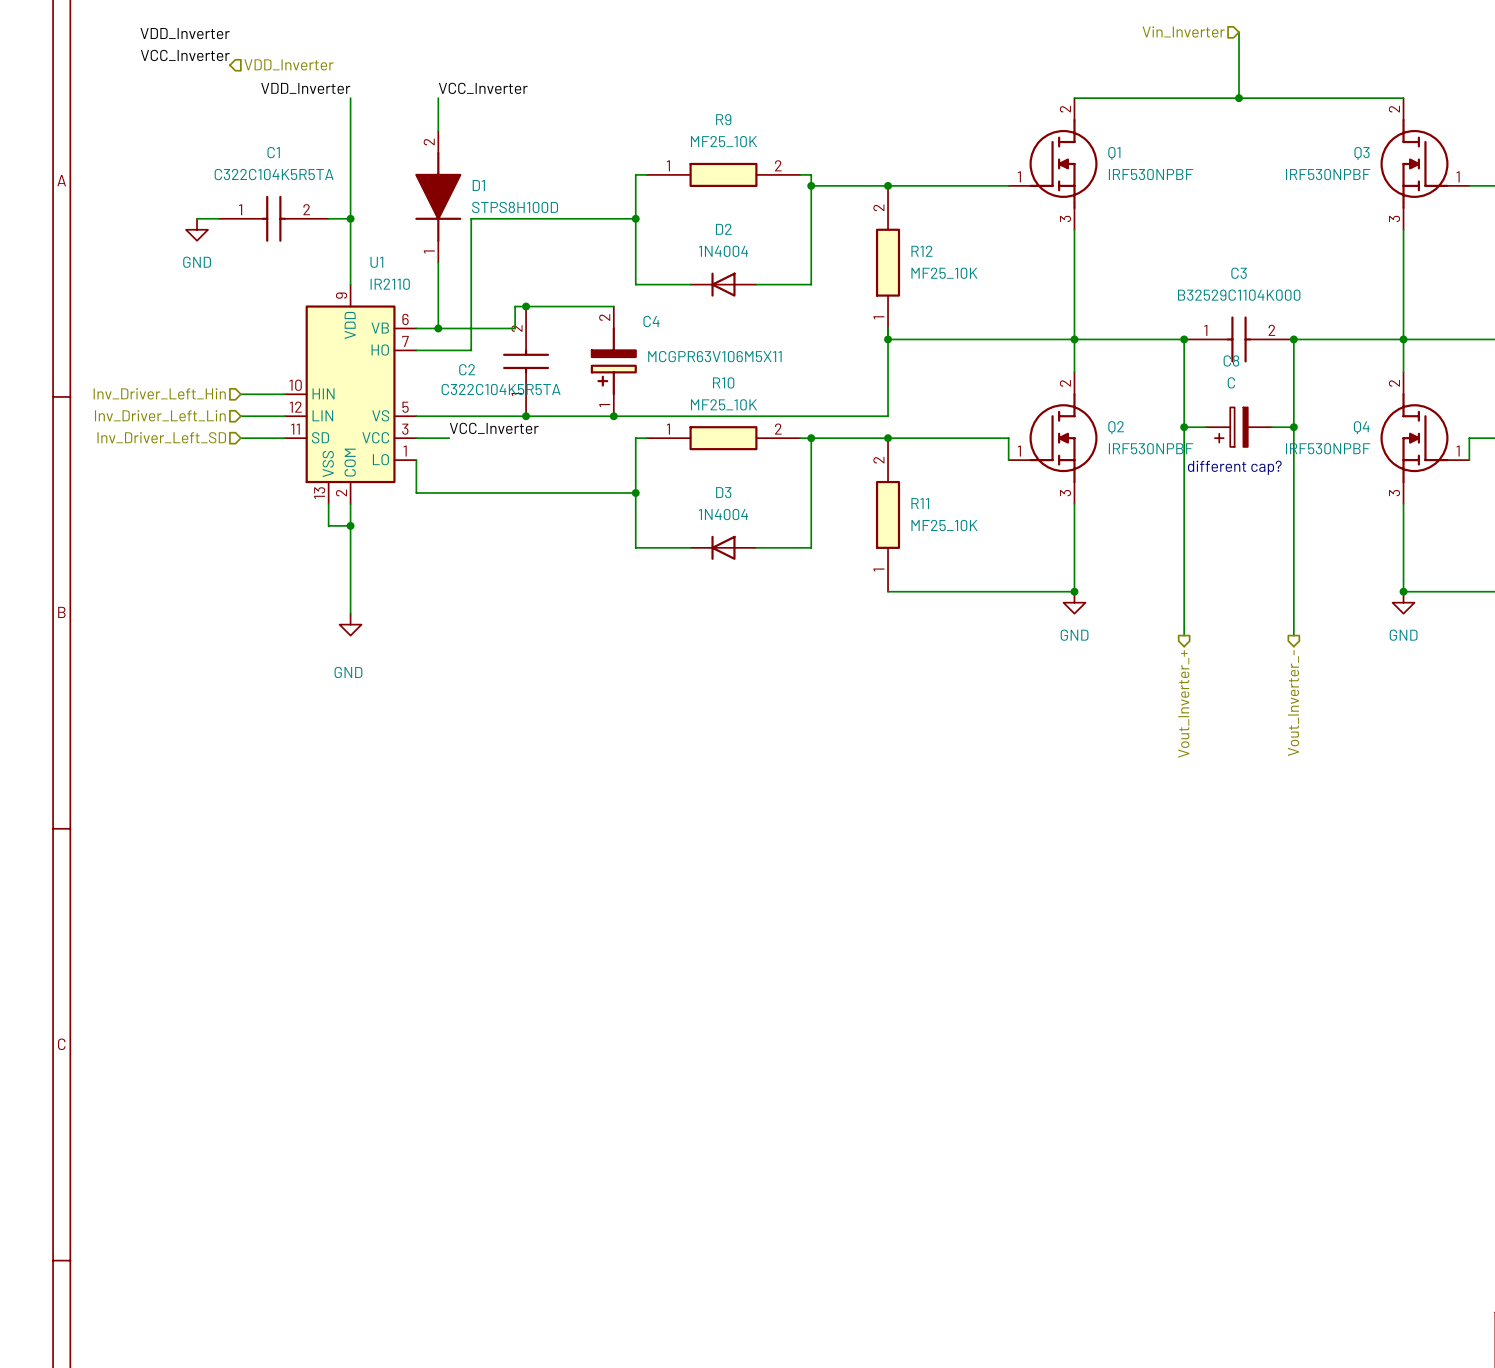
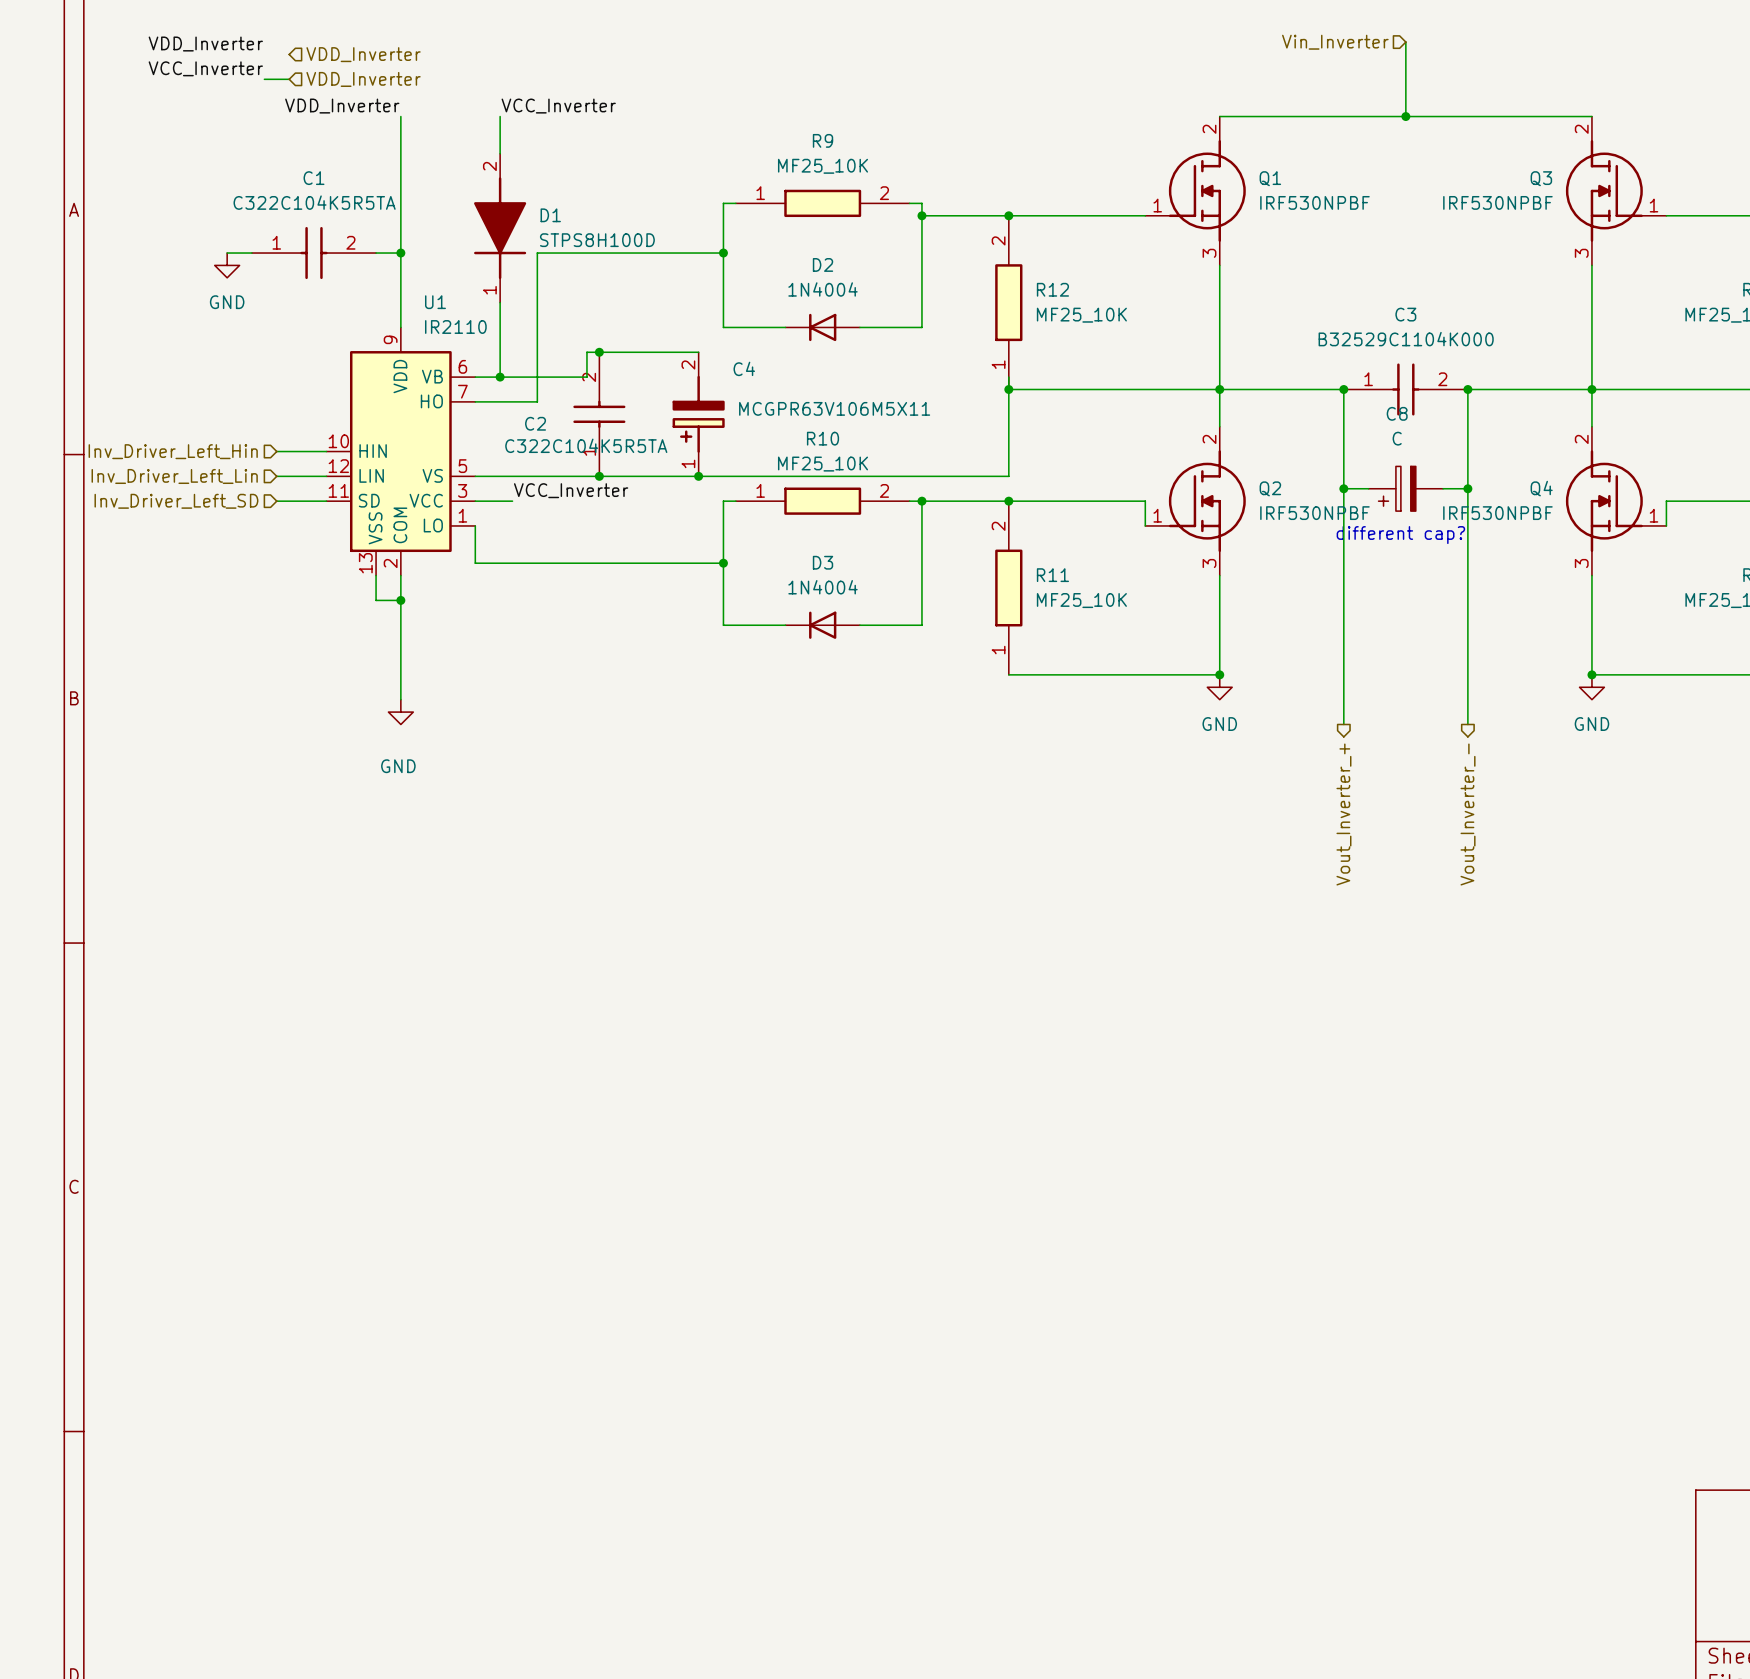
hierarchical label: none -> VDD_Inverter (363, 54)
hierarchical label: VDD_Inverter (288, 64) -> none
hierarchical label: none -> VDD_Inverter (363, 79)
wire: none -> (264, 79) (289, 79)

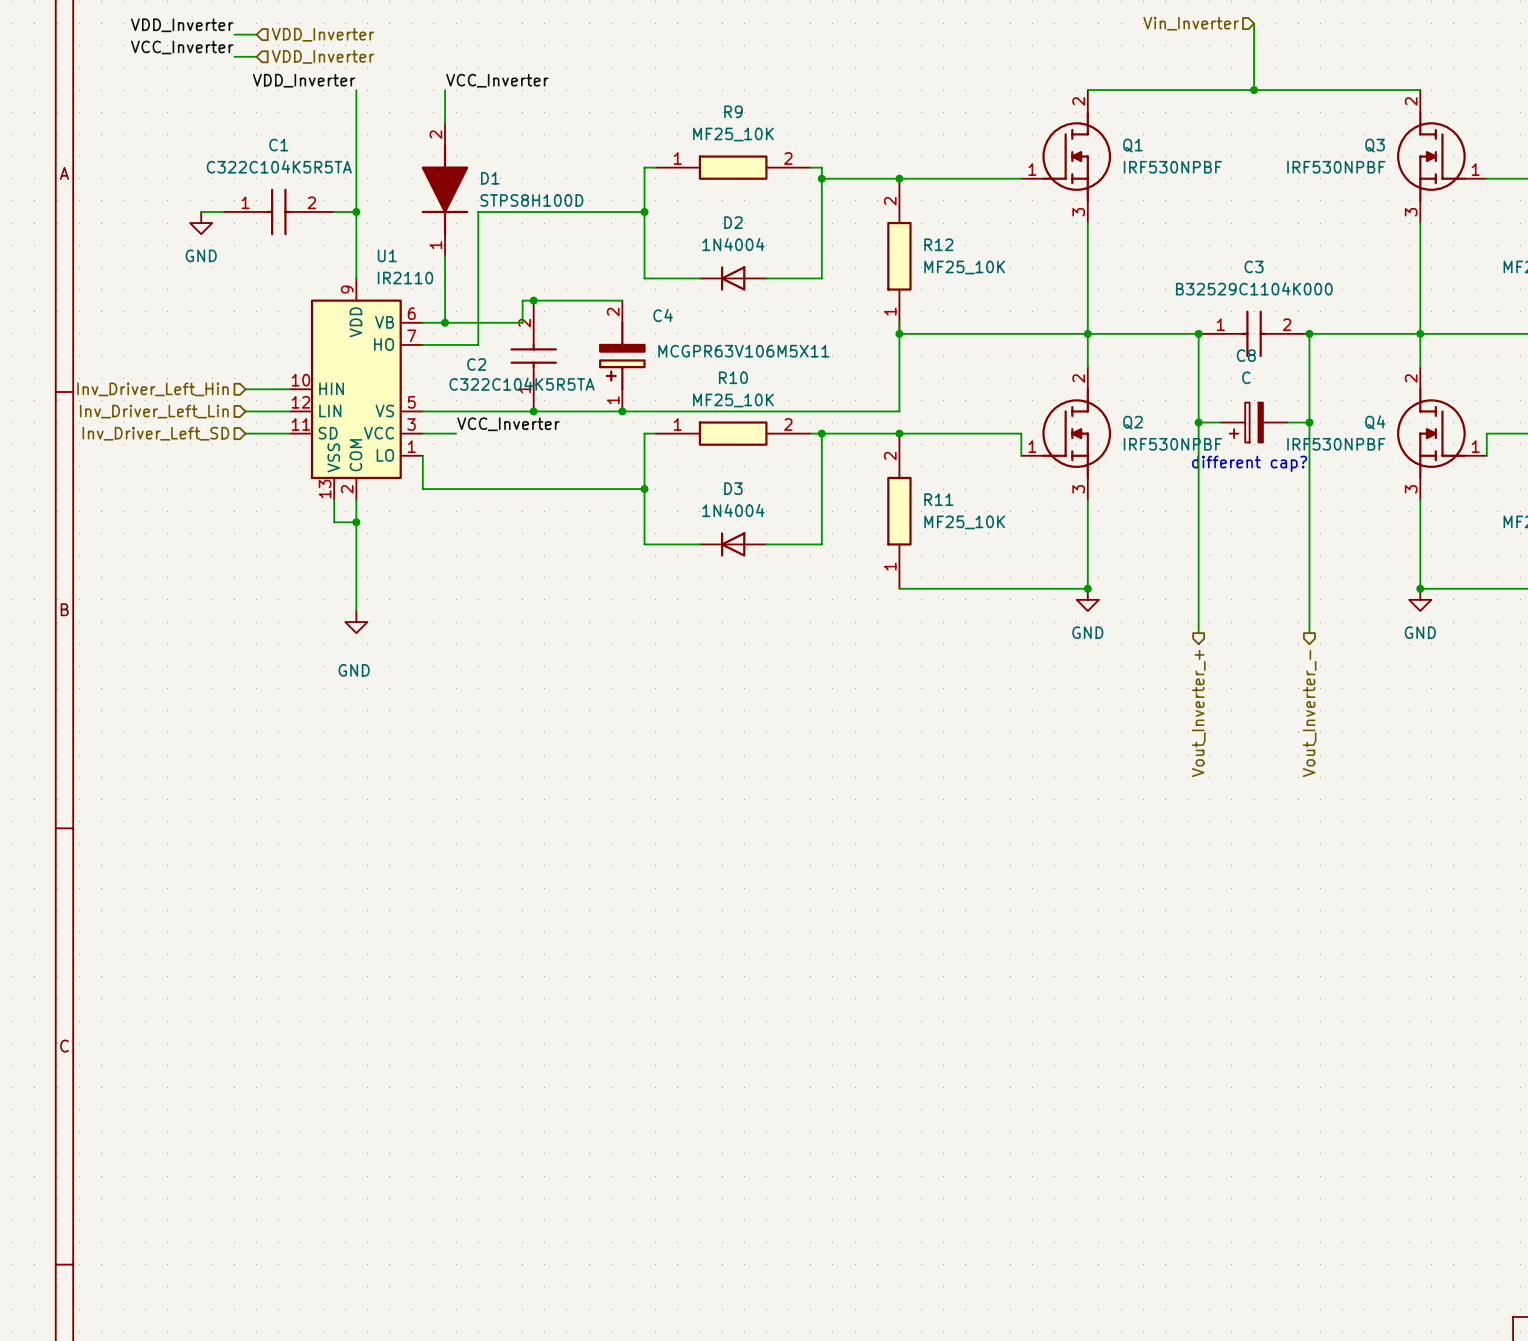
wire: none -> (234, 34) (256, 34)

